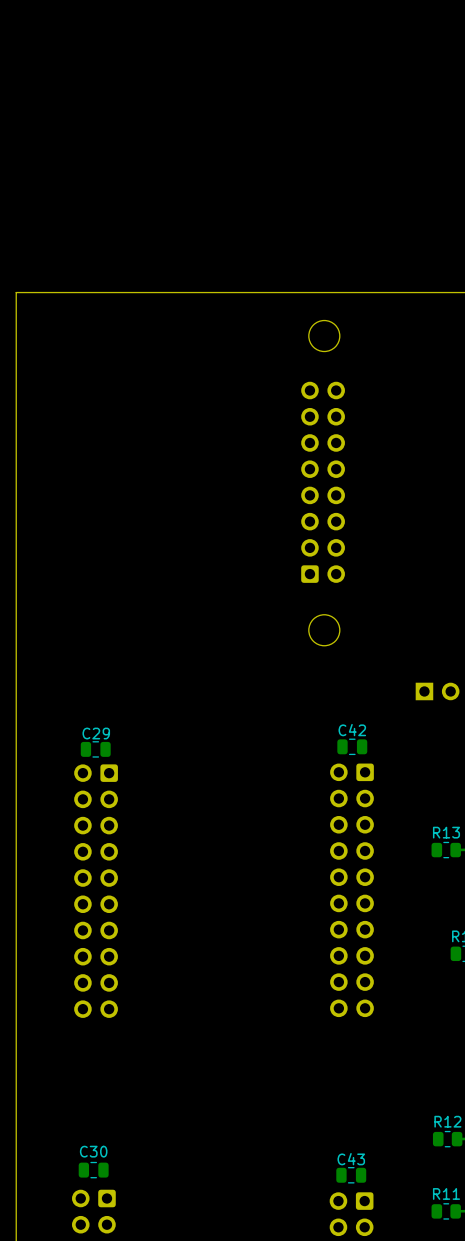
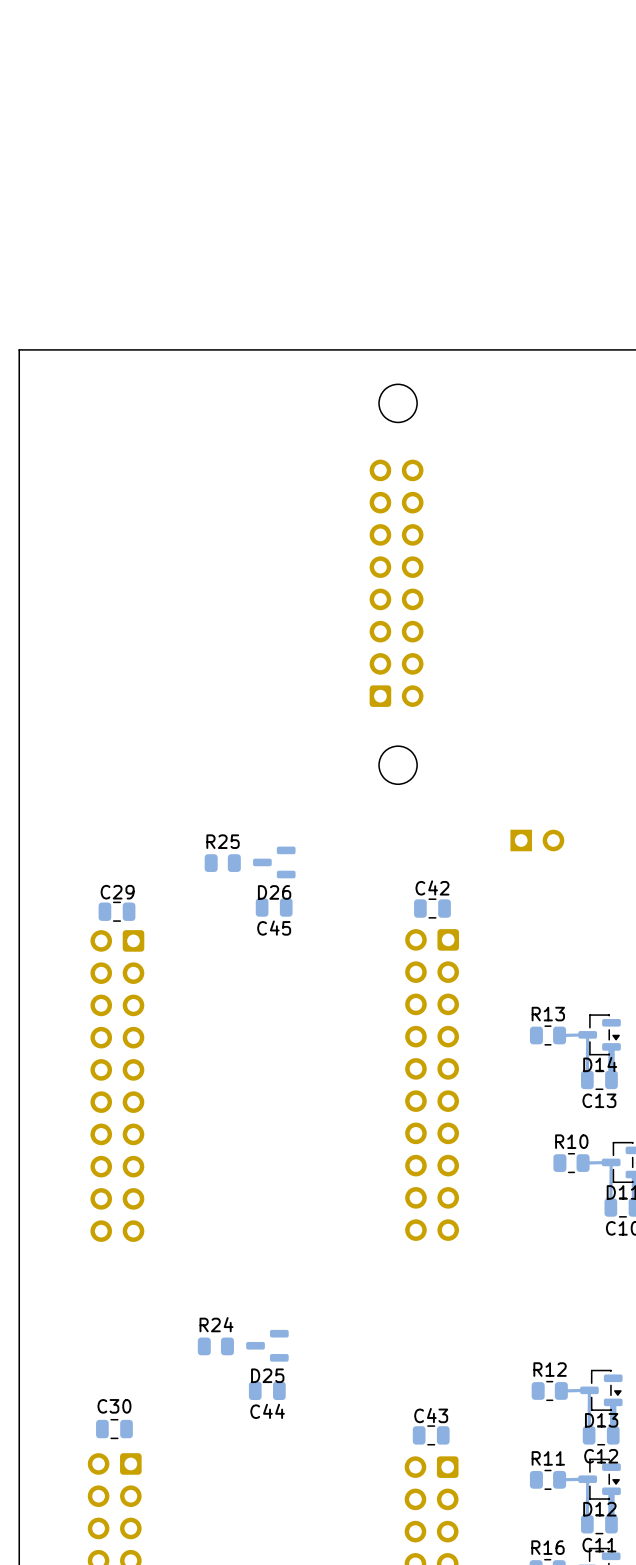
R25: none -> (222, 863)
D26: none -> (274, 862)
C45: none -> (274, 907)
R24: none -> (215, 1346)
D25: none -> (267, 1345)
C44: none -> (267, 1390)

